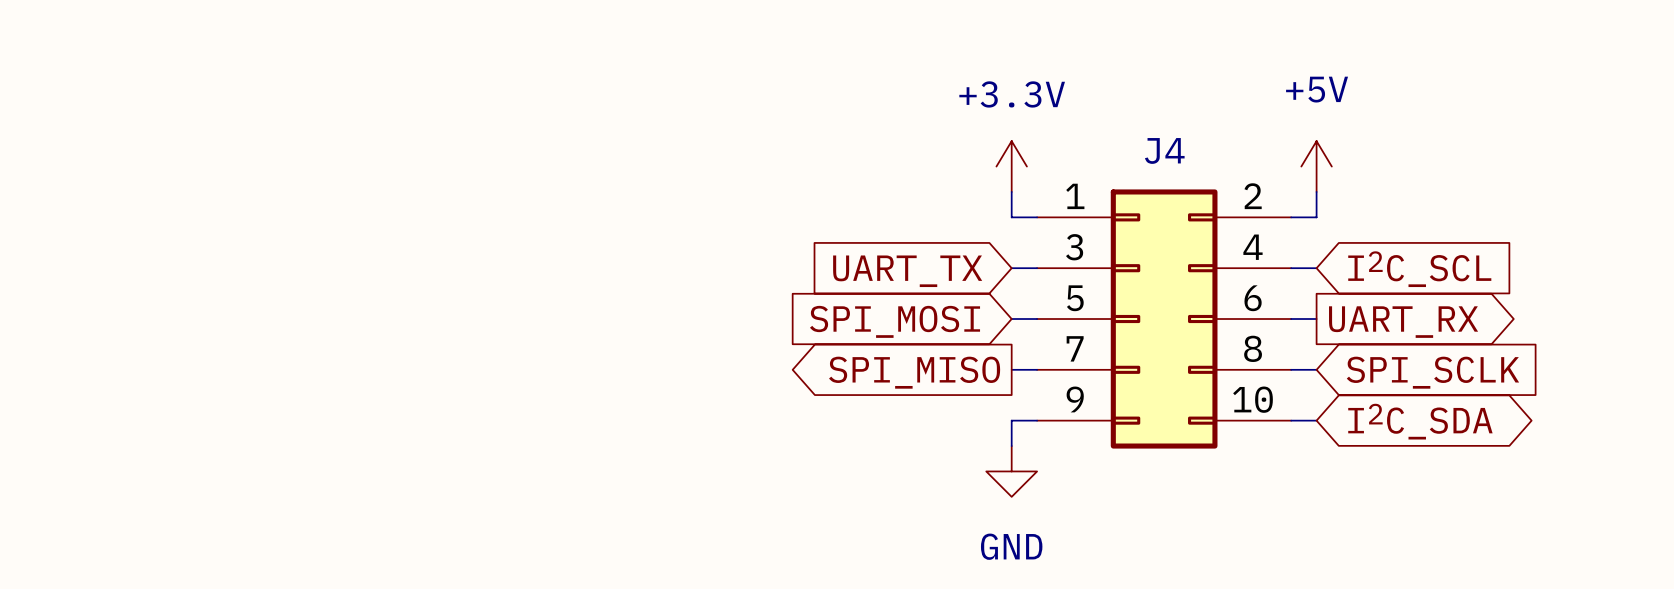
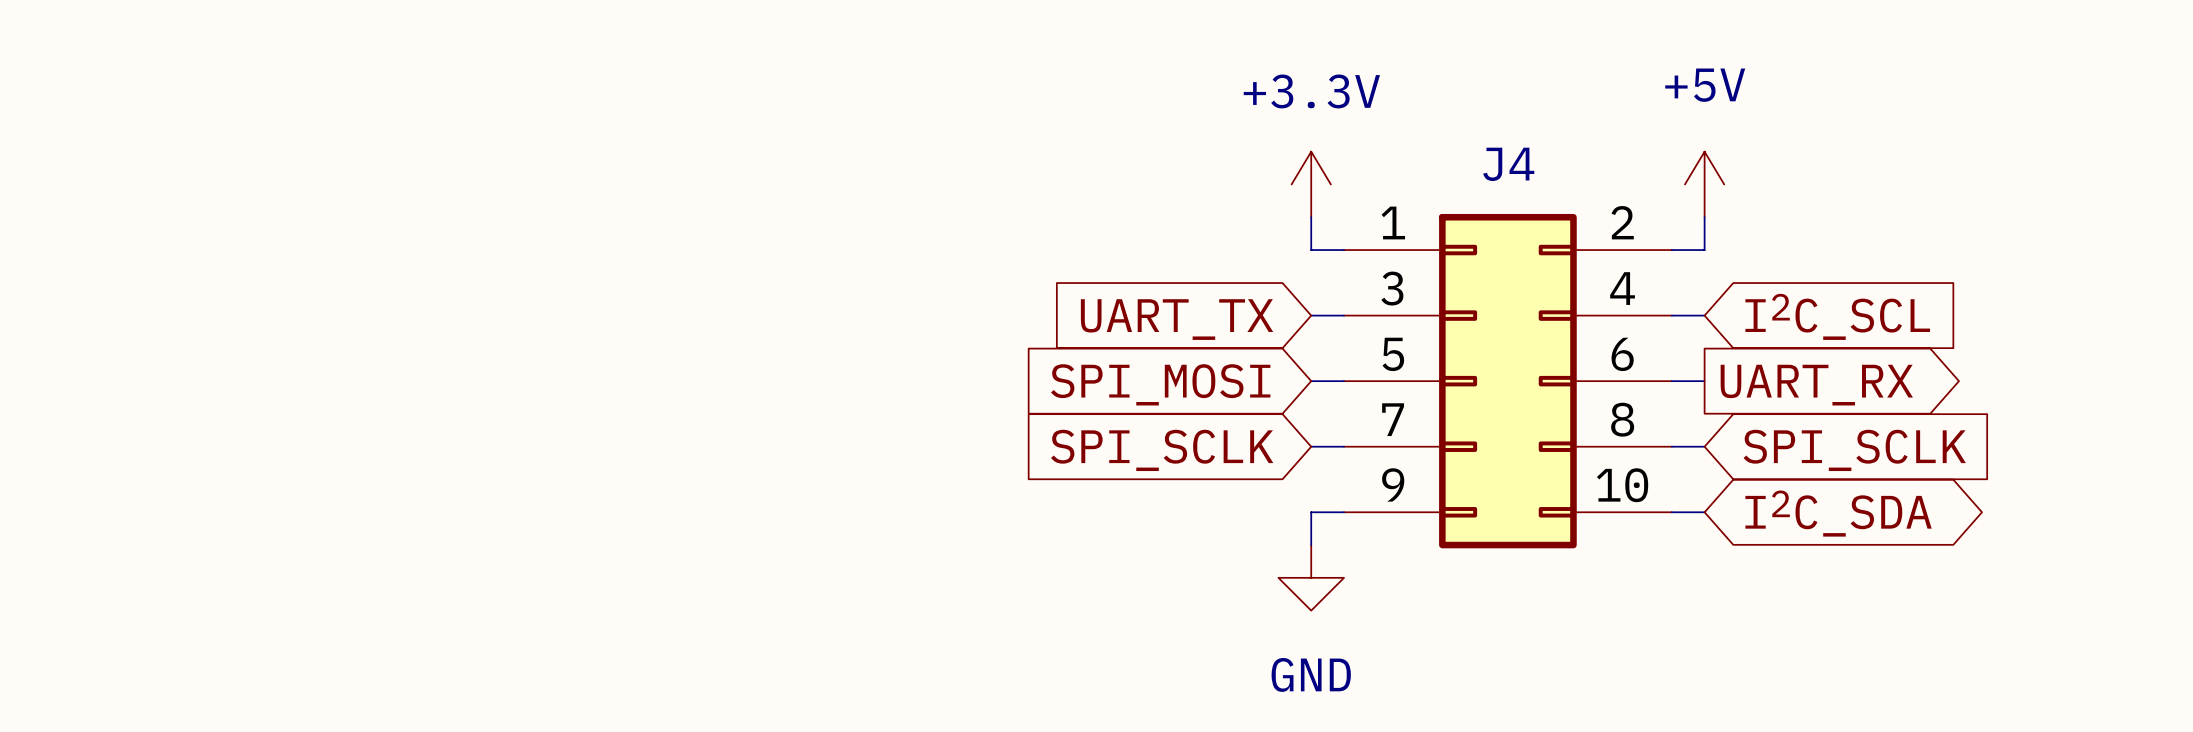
global label shape: output (914, 372) -> input (1162, 450)
global label: SPI_MISO (914, 372) -> SPI_SCLK (1162, 450)

